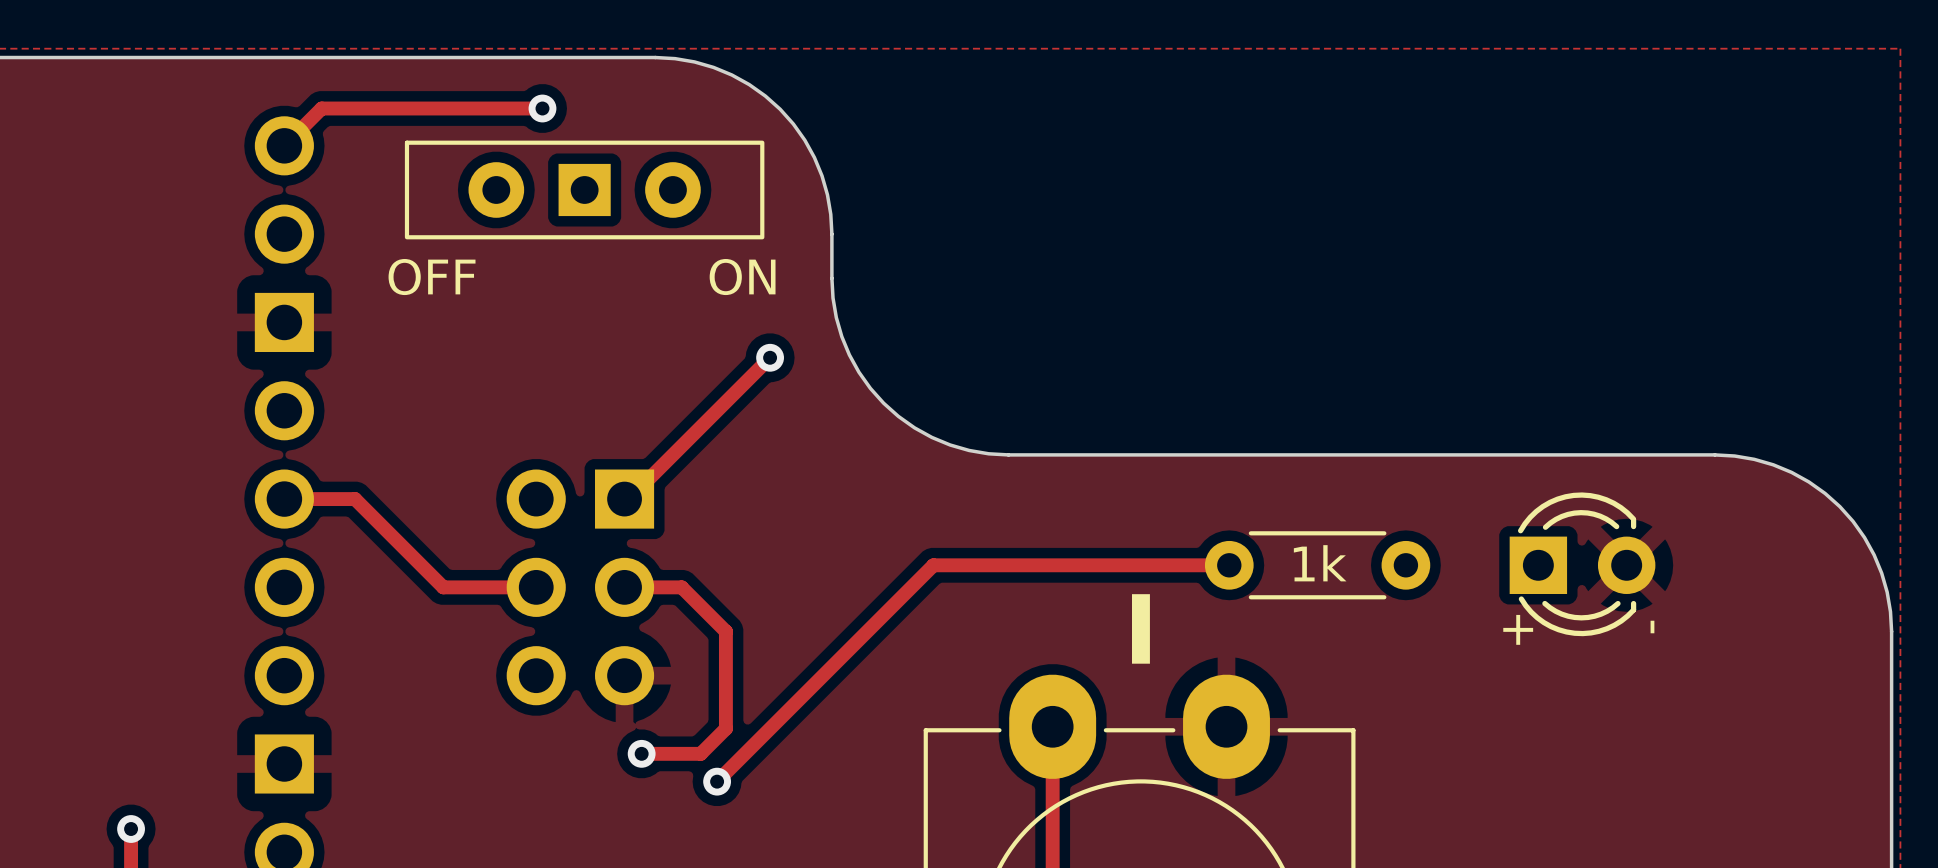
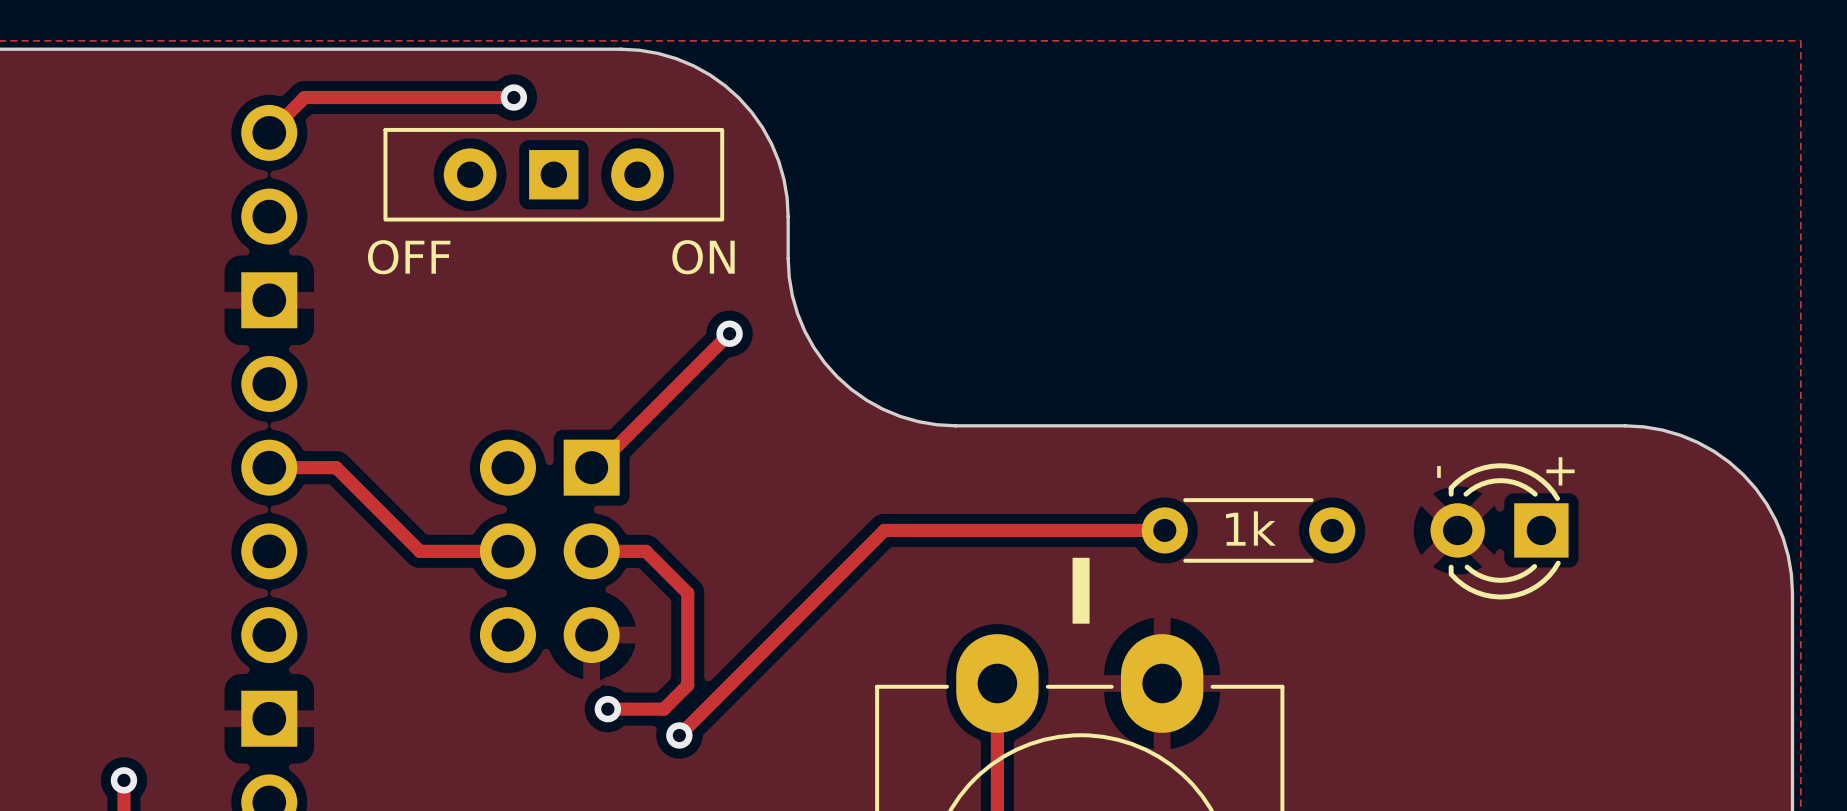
part rotation: 0° (1582, 564) -> 180° (1499, 531)

